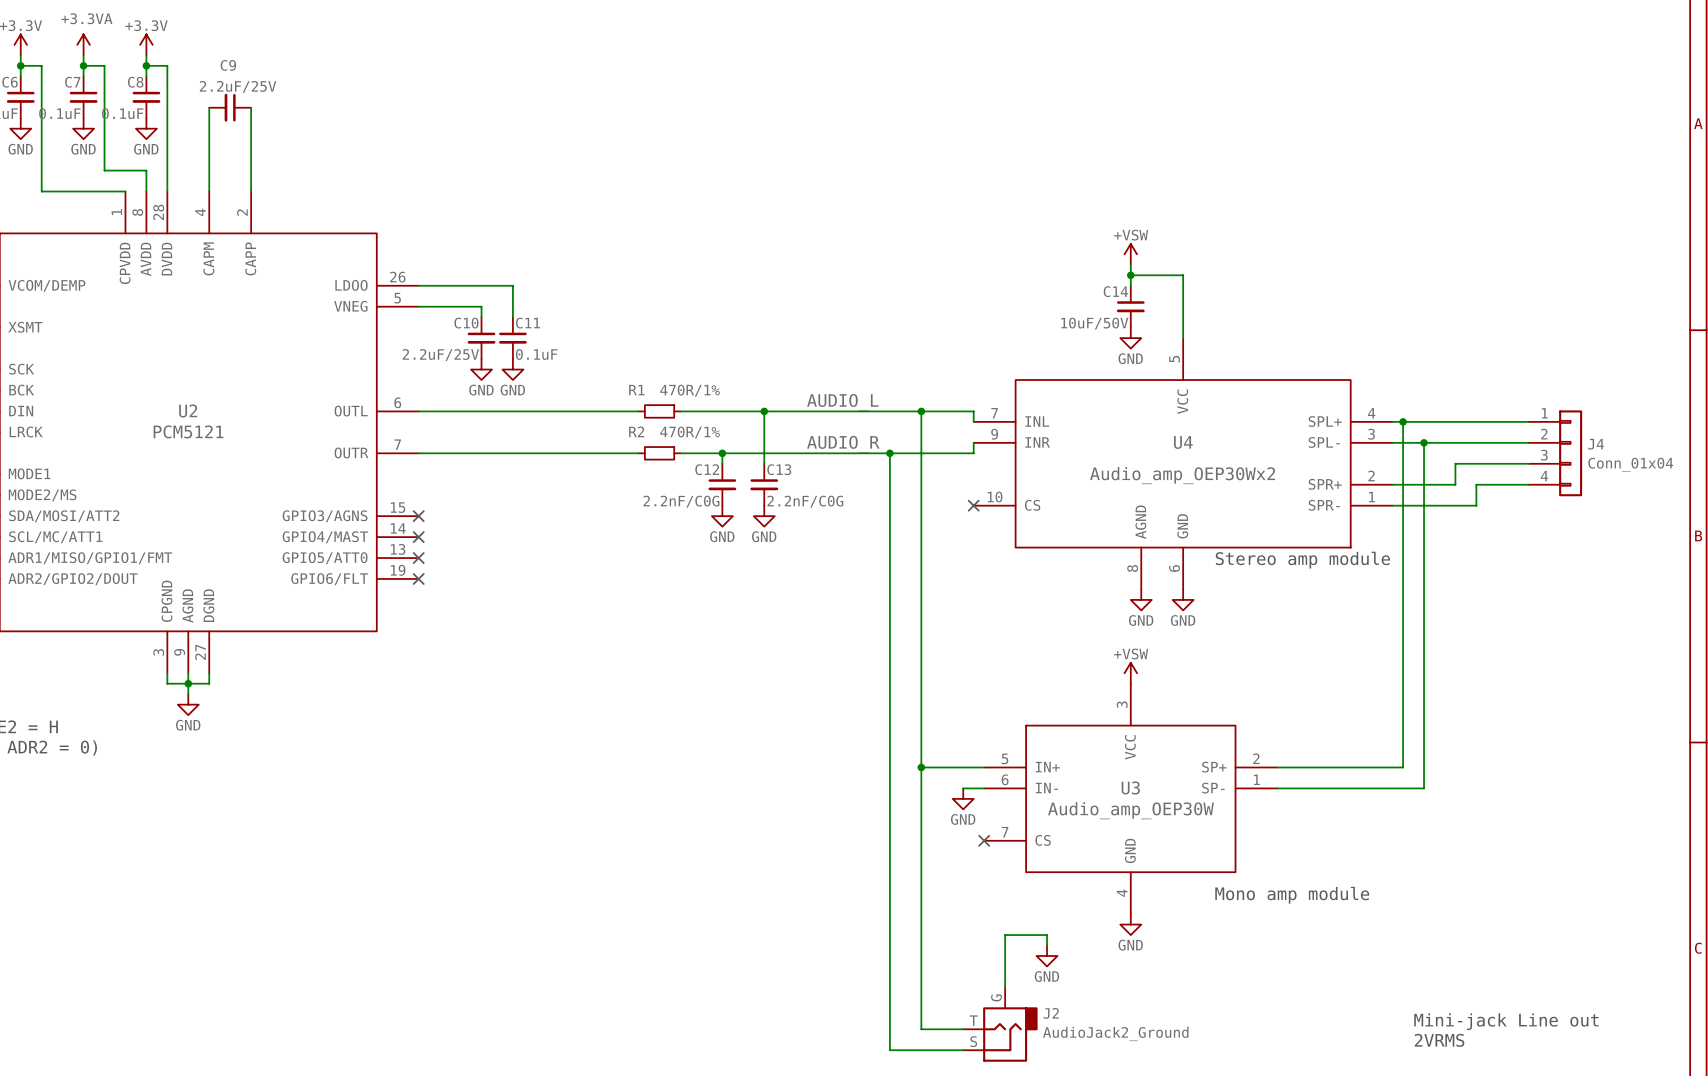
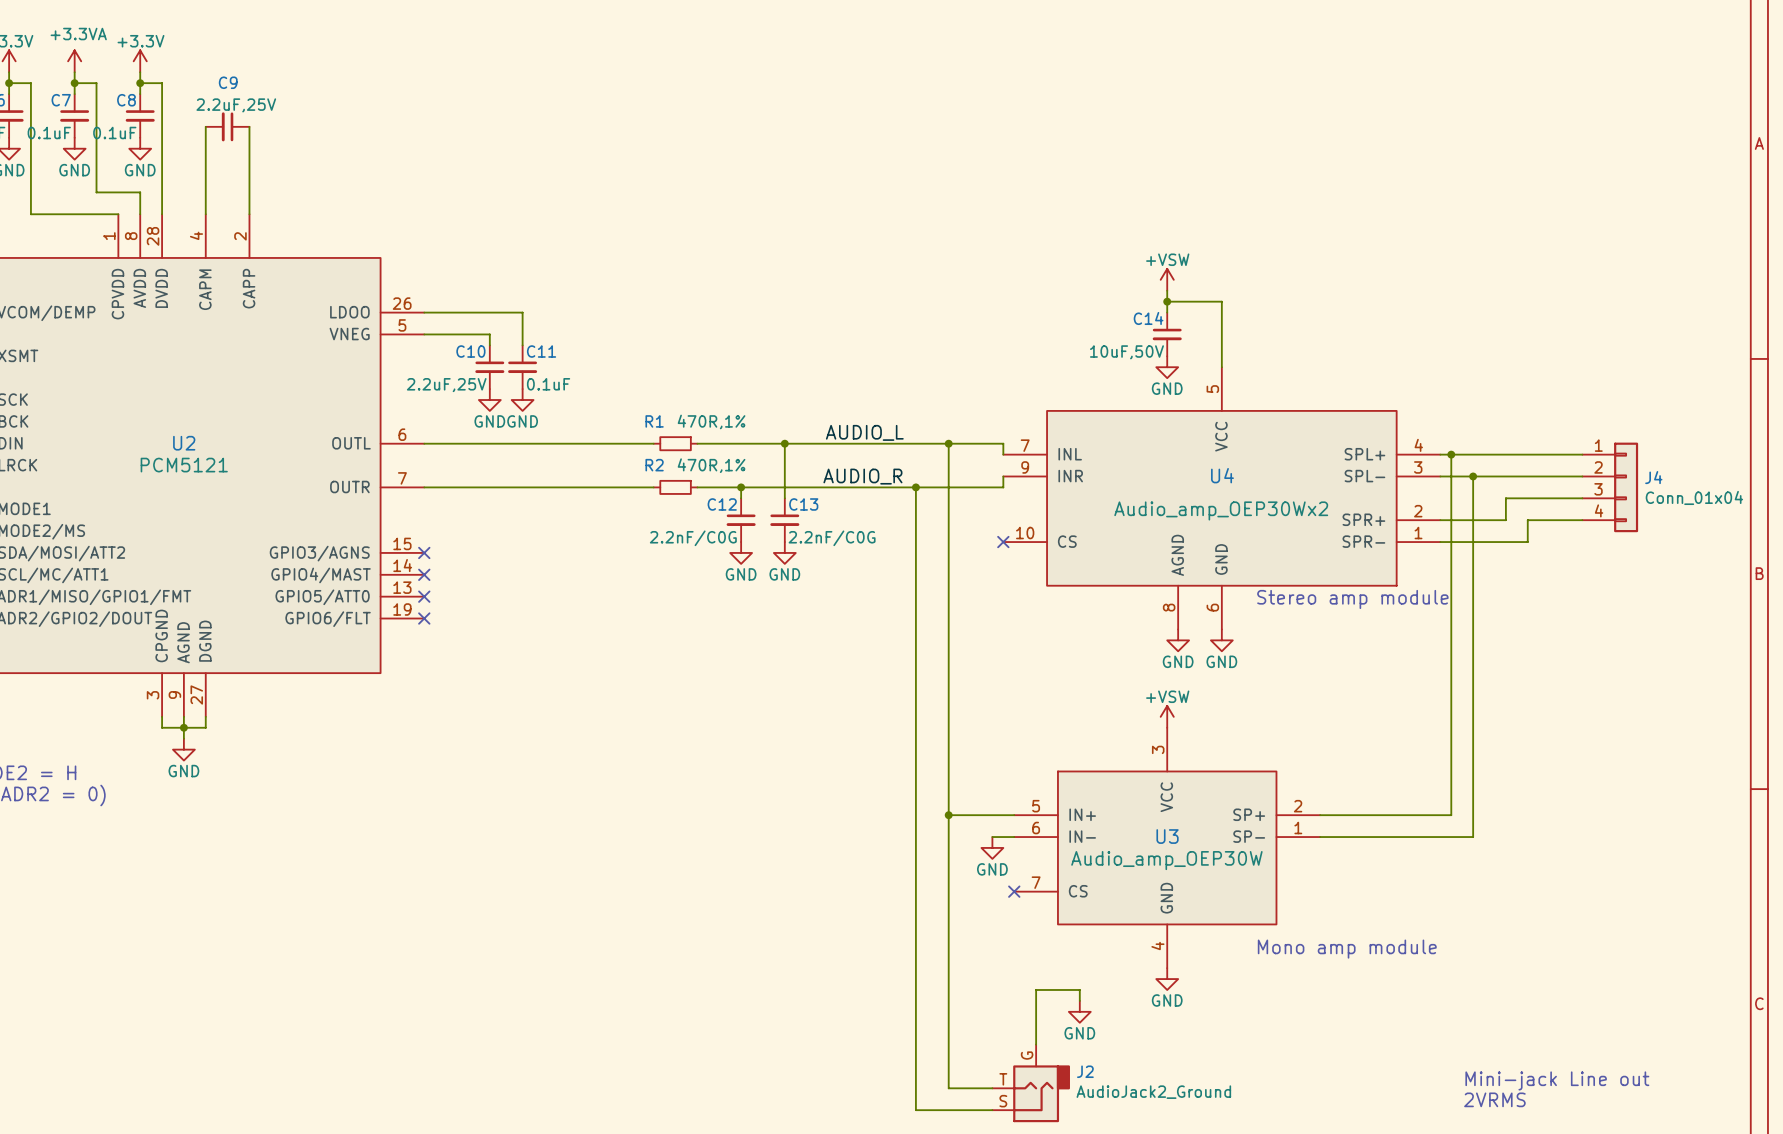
C9 value: 2.2uF/25V (238, 86) -> 2.2uF,25V (236, 105)
C14 value: 10uF/50V (1094, 323) -> 10uF,50V (1126, 352)
C10 value: 2.2uF/25V (440, 355) -> 2.2uF,25V (446, 385)
R1 value: 470R/1% (690, 390) -> 470R,1% (711, 421)
R2 value: 470R/1% (690, 432) -> 470R,1% (711, 465)

